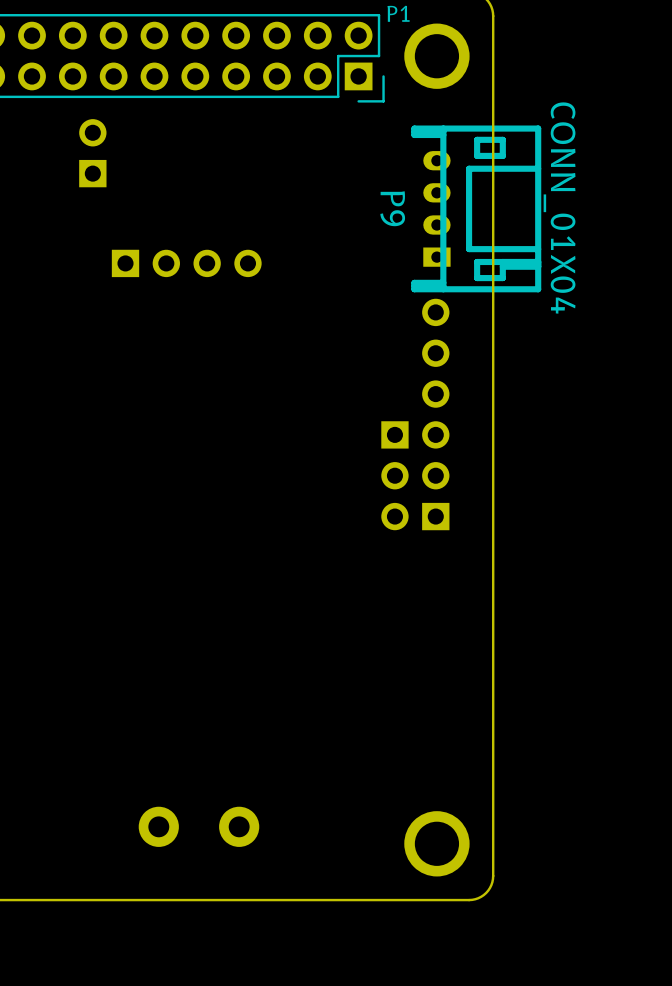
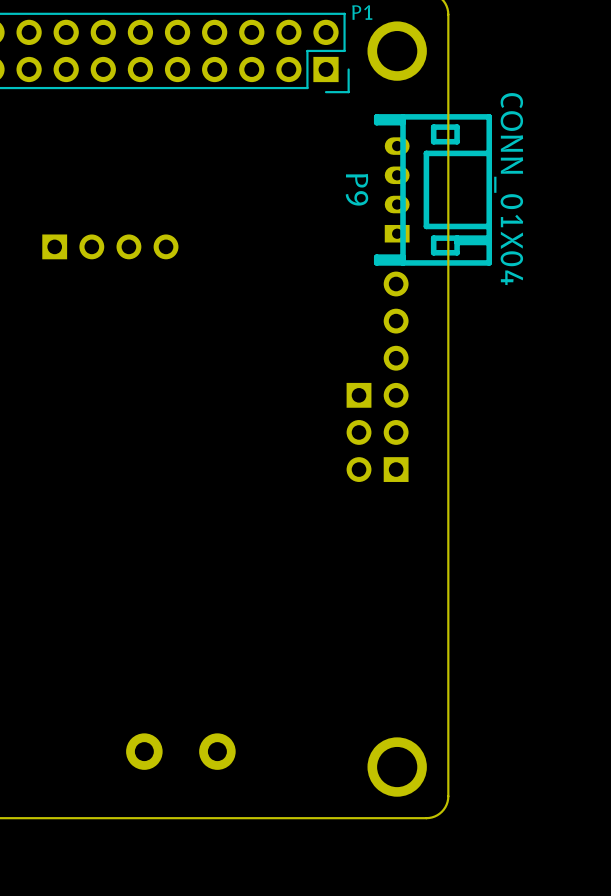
part: (92, 153) -> none
part position: (186, 263) -> (110, 246)

